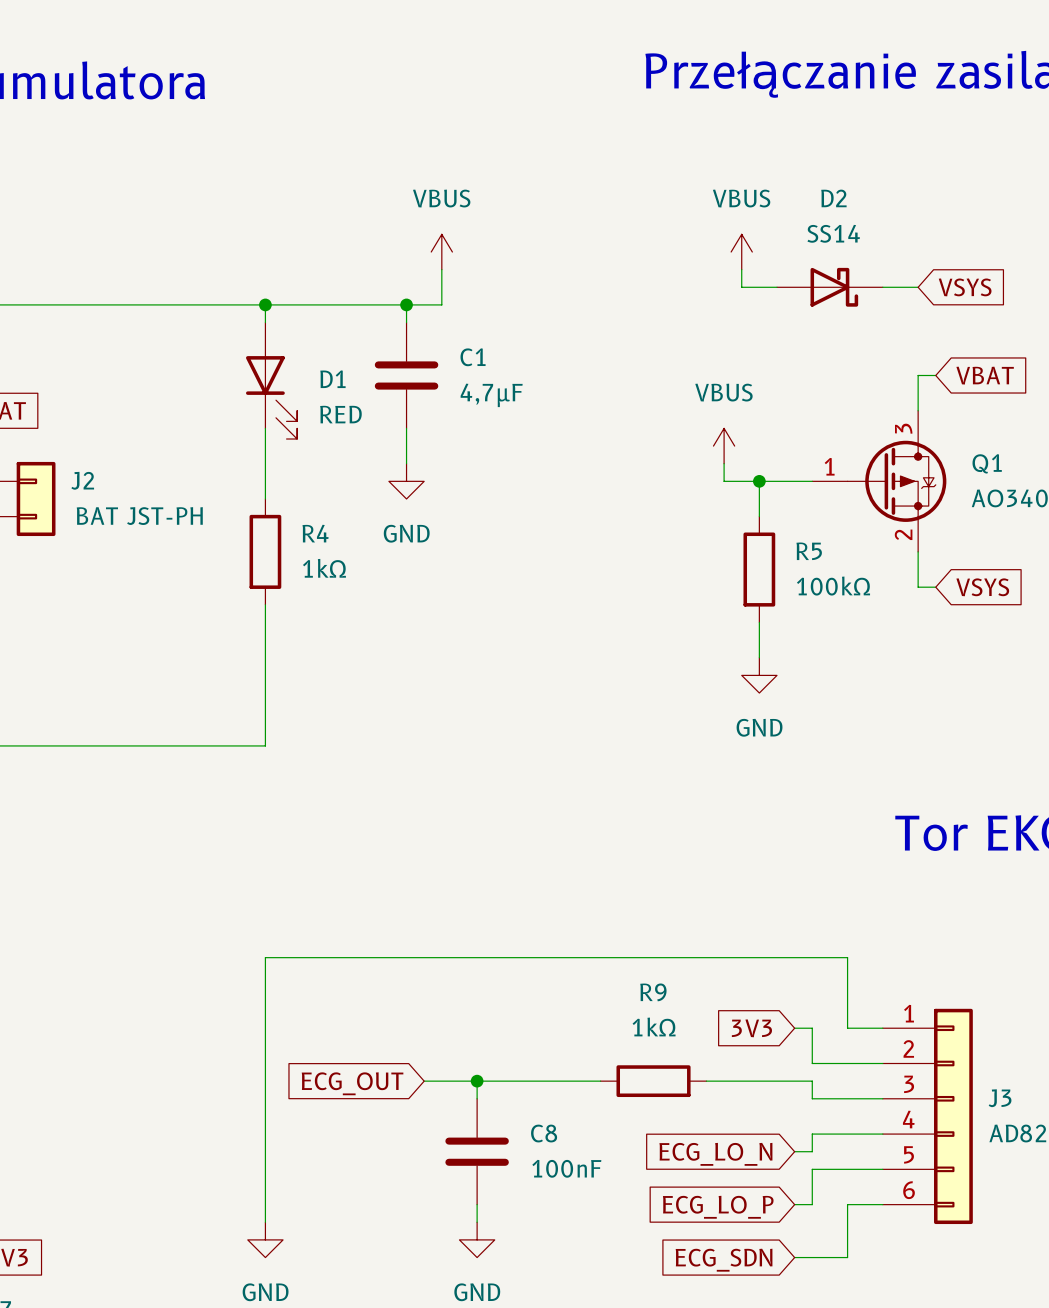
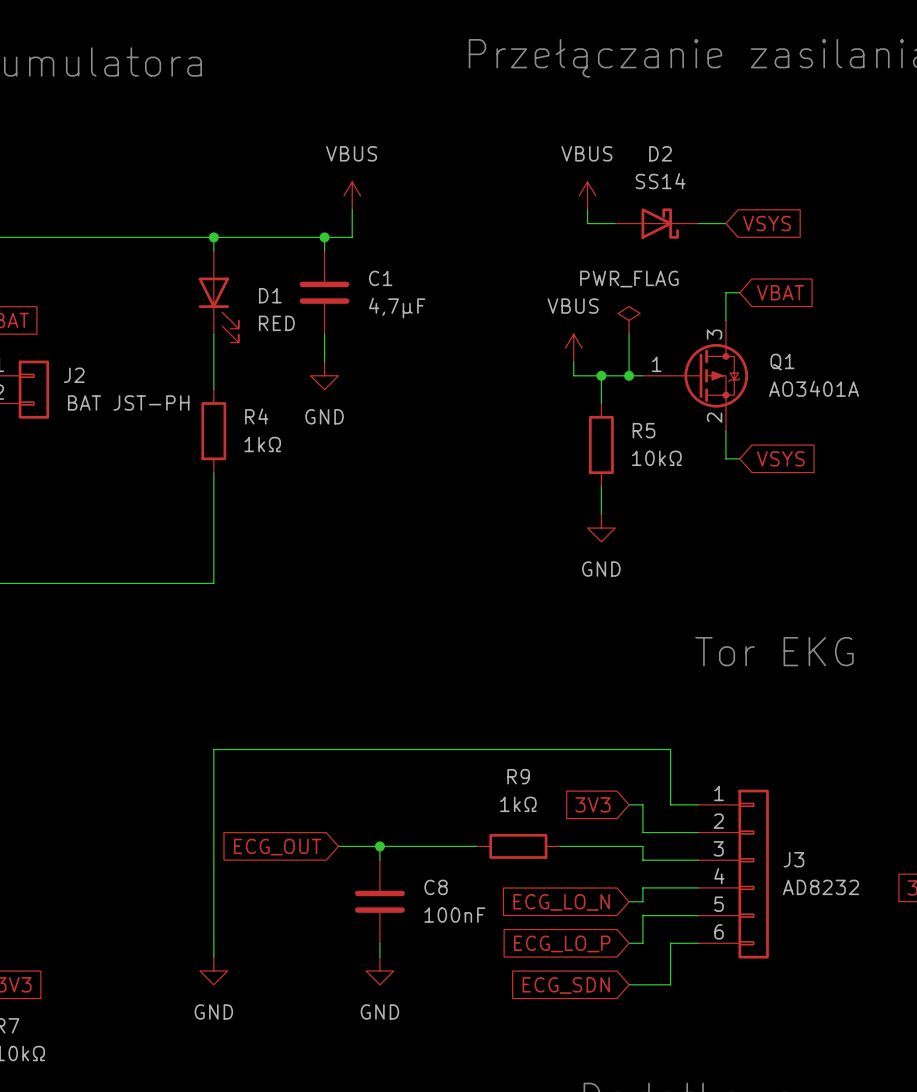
power symbol: none -> PWR_FLAG (629, 320)
wire: none -> (629, 334) (629, 375)
junction: none -> (629, 375)
R5 value: 100kΩ (833, 586) -> 10kΩ (656, 458)

